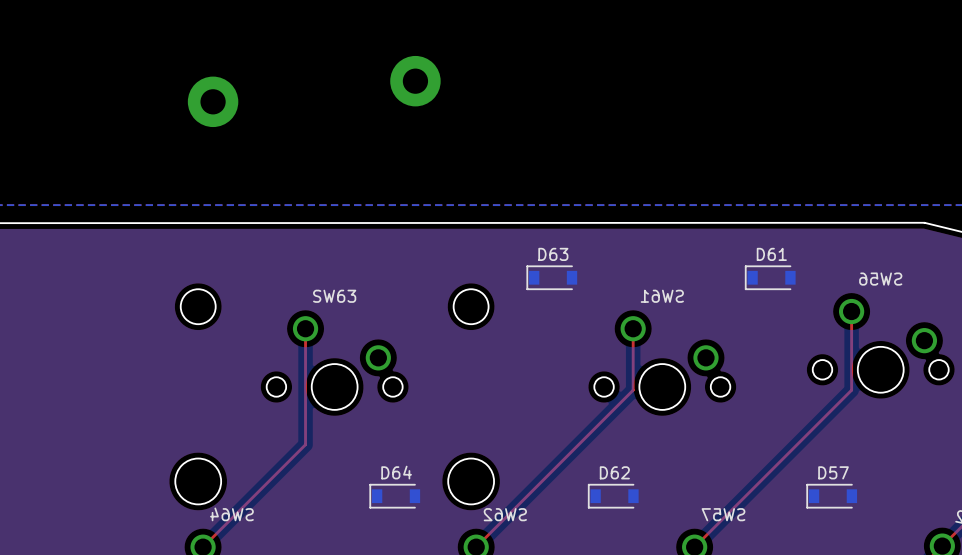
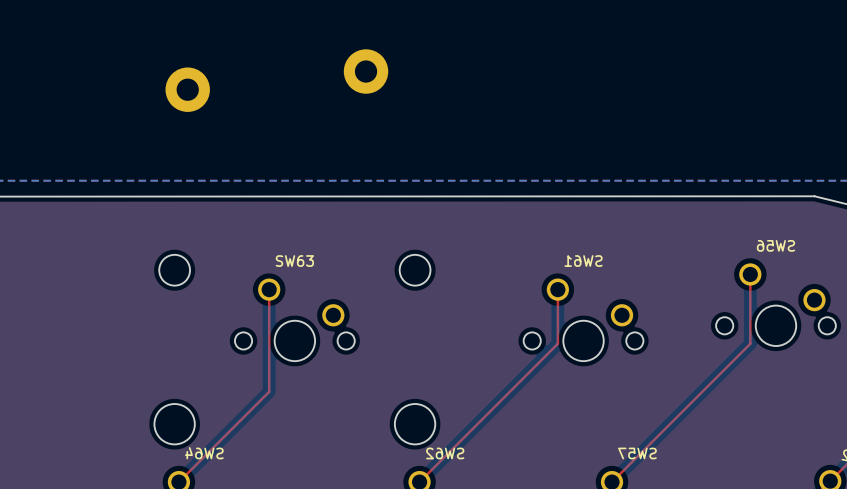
D63: (551, 277) -> none
D61: (770, 277) -> none
D64: (394, 496) -> none
D62: (613, 496) -> none
D57: (831, 496) -> none

